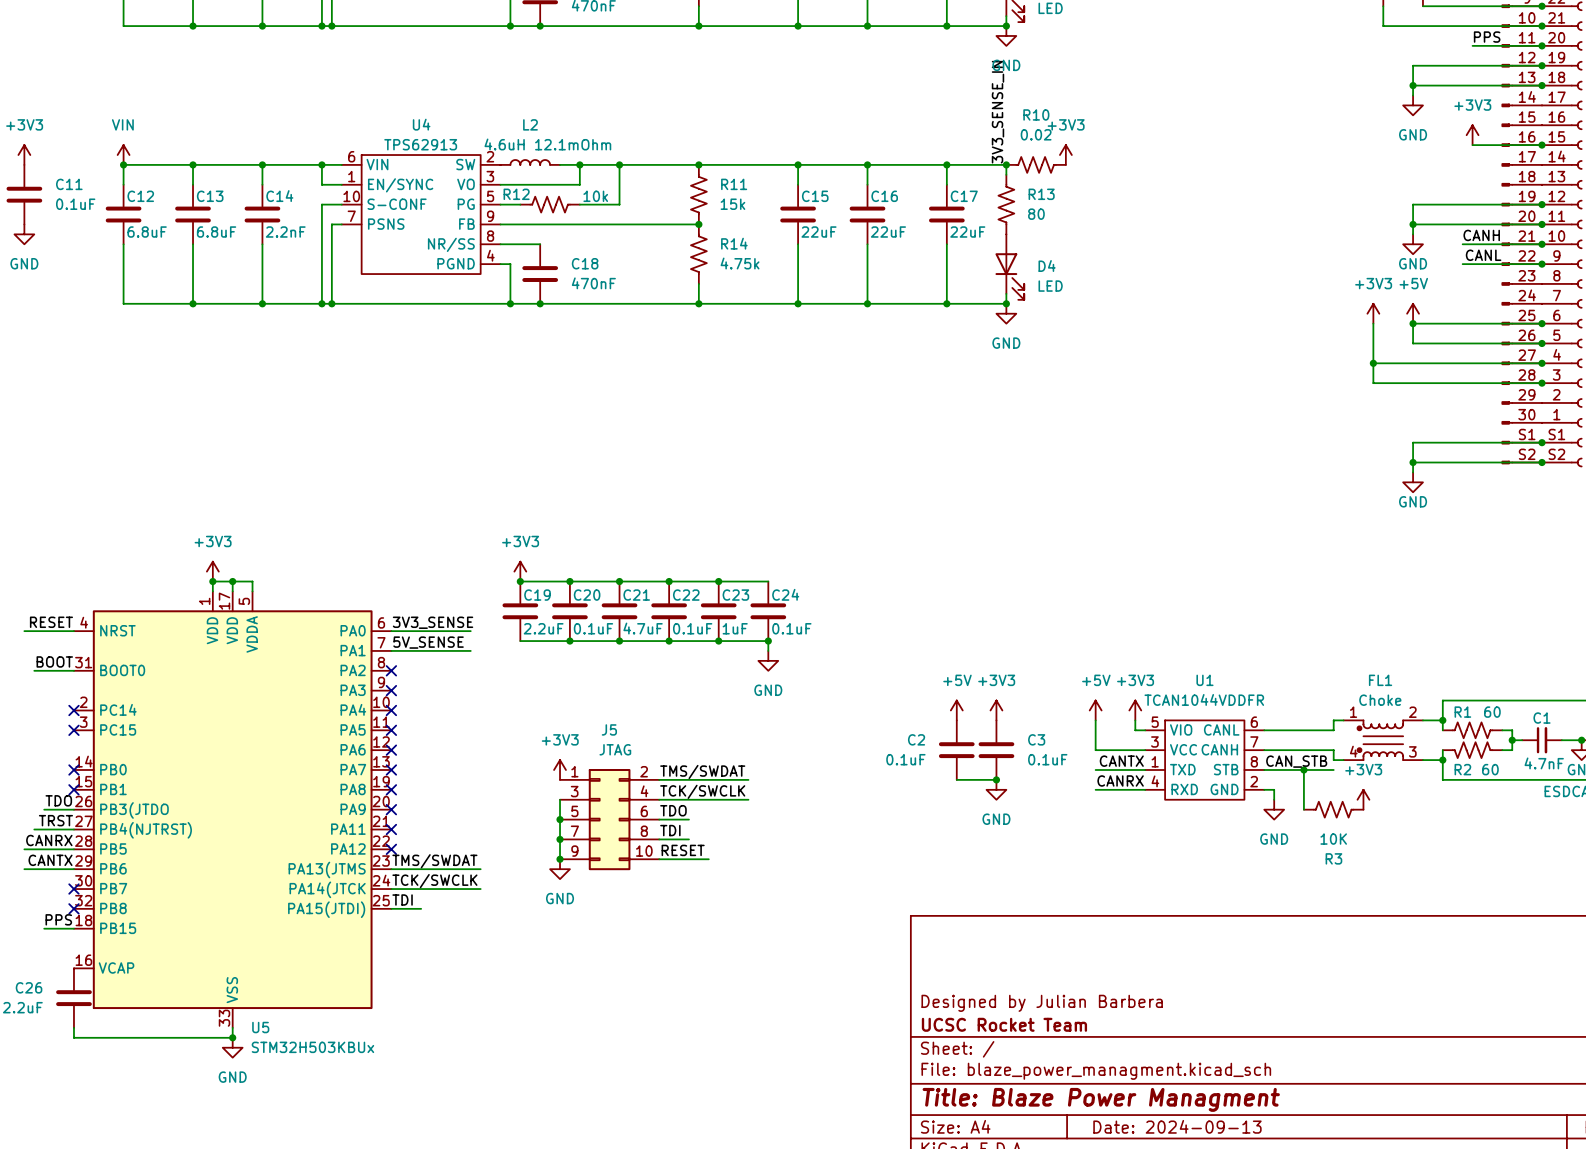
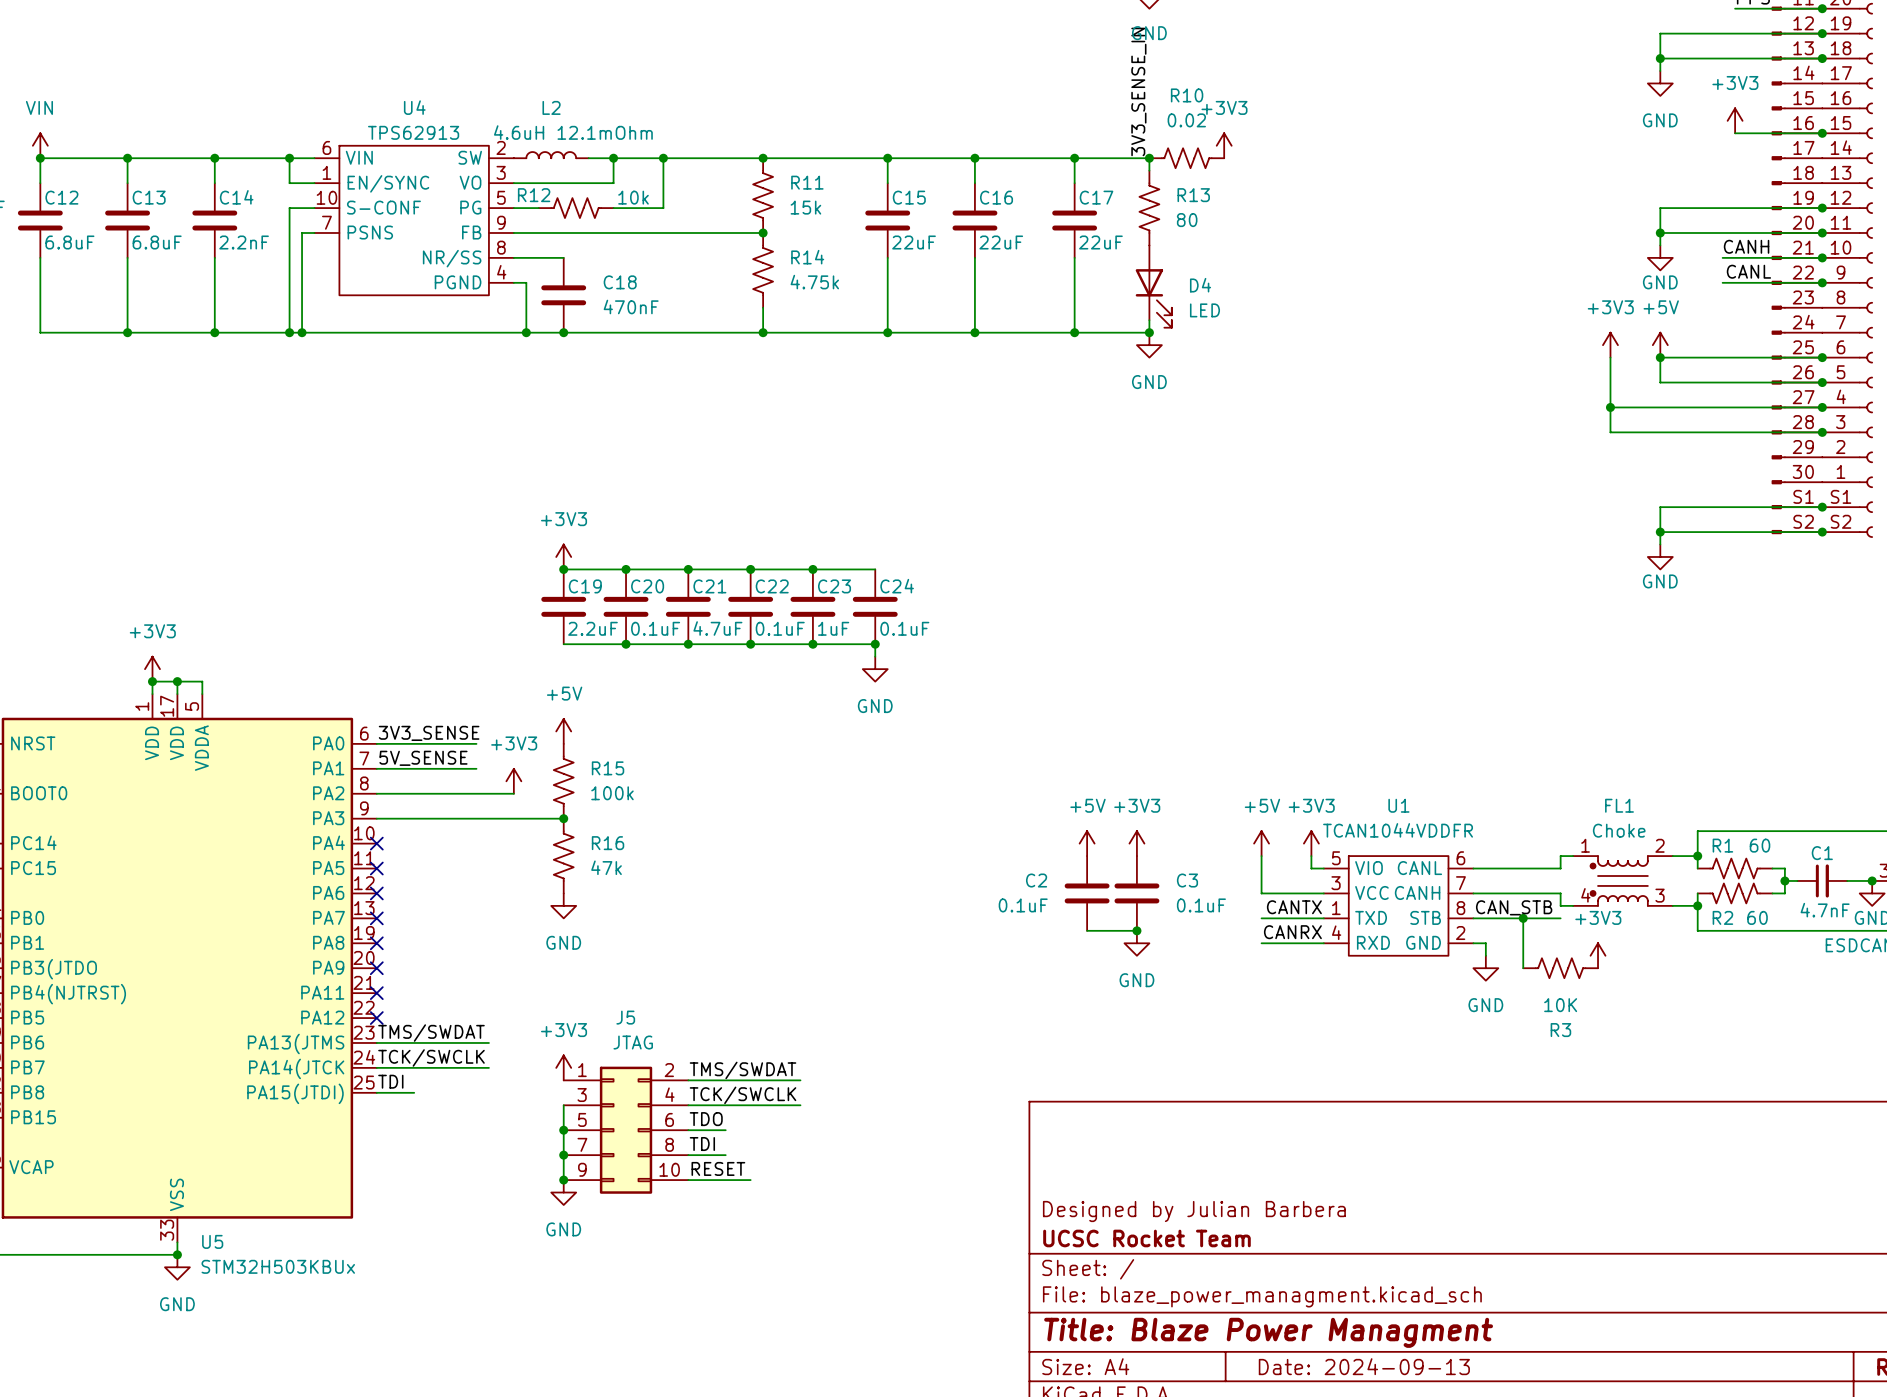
power symbol: none -> +3V3 (563, 556)
junction: none -> (563, 569)
junction: none -> (626, 569)
junction: none -> (688, 569)
junction: none -> (750, 569)
junction: none -> (812, 569)
junction: none -> (626, 644)
junction: none -> (688, 644)
junction: none -> (750, 644)
junction: none -> (812, 644)
junction: none -> (875, 644)
power symbol: +3V3 (520, 571) -> none
wire: (520, 581) (768, 581) -> (563, 569) (875, 569)
junction: (520, 581) -> none
junction: (569, 581) -> none
junction: (619, 581) -> none
junction: (669, 581) -> none
junction: (718, 581) -> none
C19 position: (520, 611) -> (563, 606)
C20 position: (569, 611) -> (626, 606)
C21 position: (619, 611) -> (688, 606)
C22 position: (669, 611) -> (750, 606)
C23 position: (718, 611) -> (812, 606)
C24 position: (768, 611) -> (875, 606)
power symbol: none -> +5V (563, 731)
wire: (520, 641) (768, 641) (768, 650) -> (563, 644) (875, 644) (875, 656)
junction: (569, 641) -> none
junction: (619, 641) -> none
junction: (669, 641) -> none
junction: (718, 641) -> none
junction: (768, 641) -> none
power symbol: none -> +3V3 (513, 781)
R15: none -> 100k (563, 781)
power symbol position: GND (768, 660) -> GND (875, 669)
wire: none -> (376, 793) (513, 793)
no-connect mark: (391, 670) -> none
wire: none -> (376, 818) (563, 818)
no-connect mark: (391, 690) -> none
junction: none -> (563, 818)
R16: none -> 47k (563, 856)
power symbol: none -> GND (563, 905)
power symbol: +3V3 (560, 769) -> none
label position: TMS/SWDAT (702, 772) -> TMS/SWDAT (743, 1070)
wire: (659, 779) (748, 779) -> (688, 1080) (800, 1080)
label position: TCK/SWCLK (702, 791) -> TCK/SWCLK (743, 1095)
wire: (560, 799) (560, 859) -> (563, 1105) (563, 1180)
wire: (659, 799) (748, 799) -> (688, 1105) (800, 1105)
label position: TDO (673, 810) -> TDO (706, 1119)
junction: (560, 819) -> none
J5 position: (609, 819) -> (626, 1130)
wire: (659, 819) (688, 819) -> (688, 1130) (725, 1130)
label position: TDI (670, 830) -> TDI (702, 1144)
junction: (560, 839) -> none
wire: (659, 839) (688, 839) -> (688, 1155) (725, 1155)
label position: RESET (683, 850) -> RESET (718, 1168)
junction: (560, 859) -> none
wire: (659, 859) (708, 859) -> (688, 1180) (750, 1180)
power symbol: GND (560, 869) -> none
power symbol: none -> +3V3 (563, 1067)
junction: none -> (563, 1130)
junction: none -> (563, 1155)
junction: none -> (563, 1180)
power symbol: none -> GND (563, 1192)

